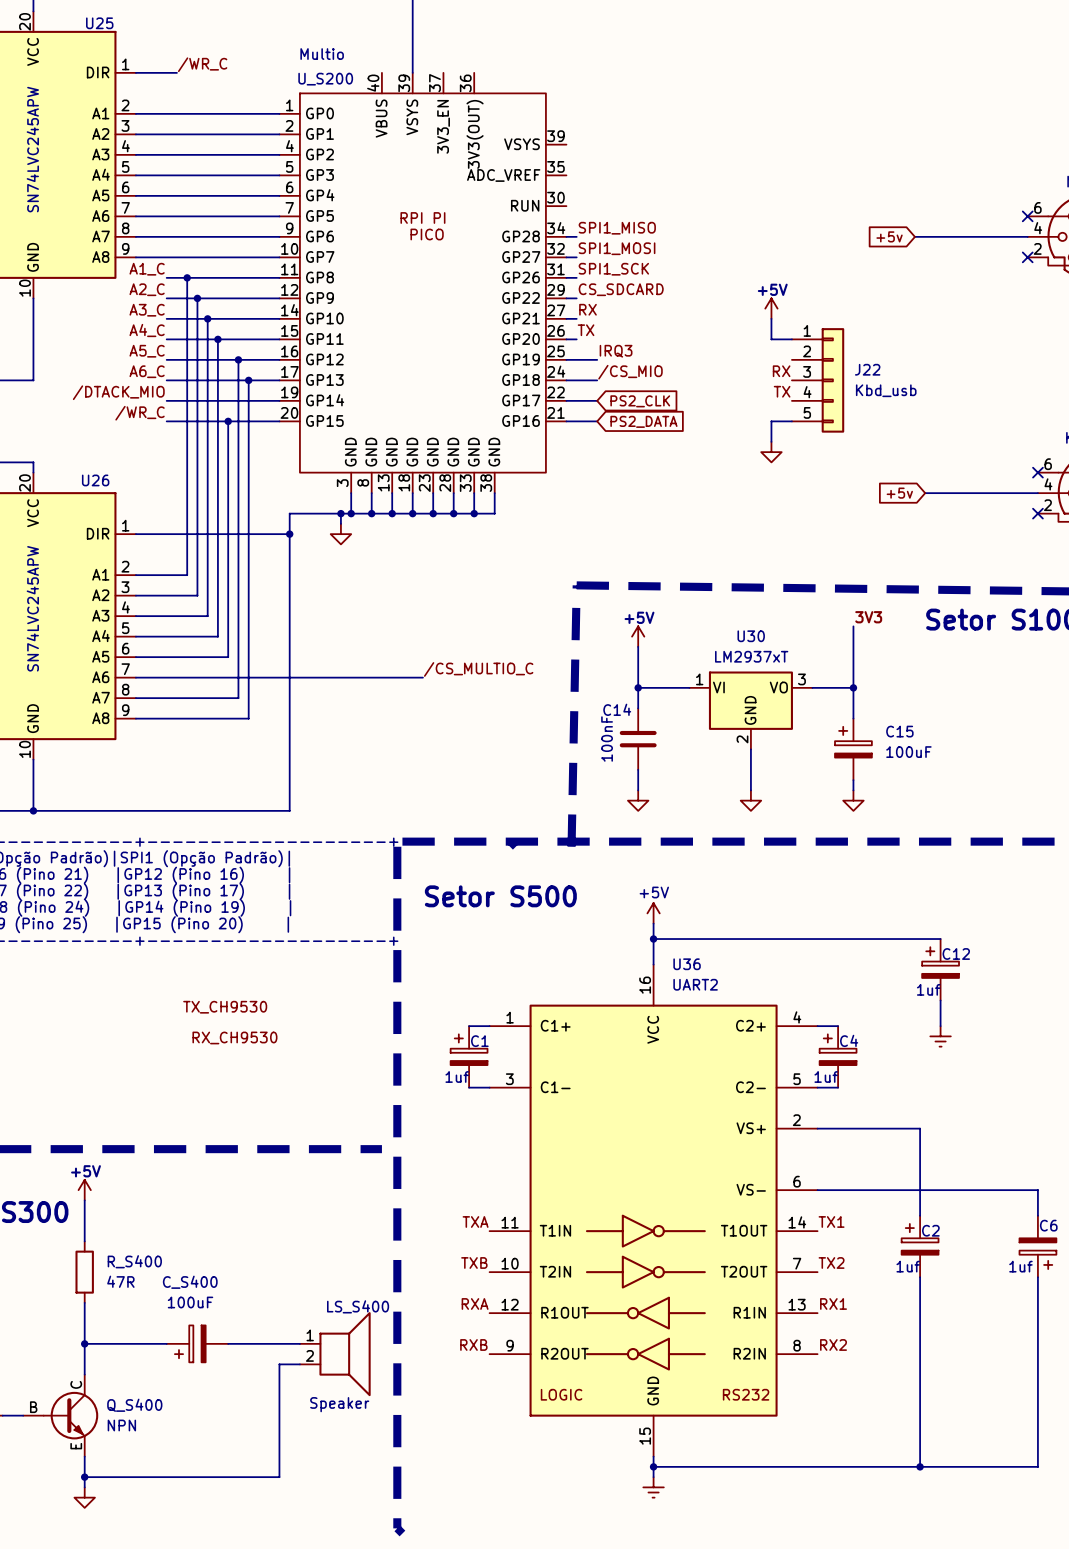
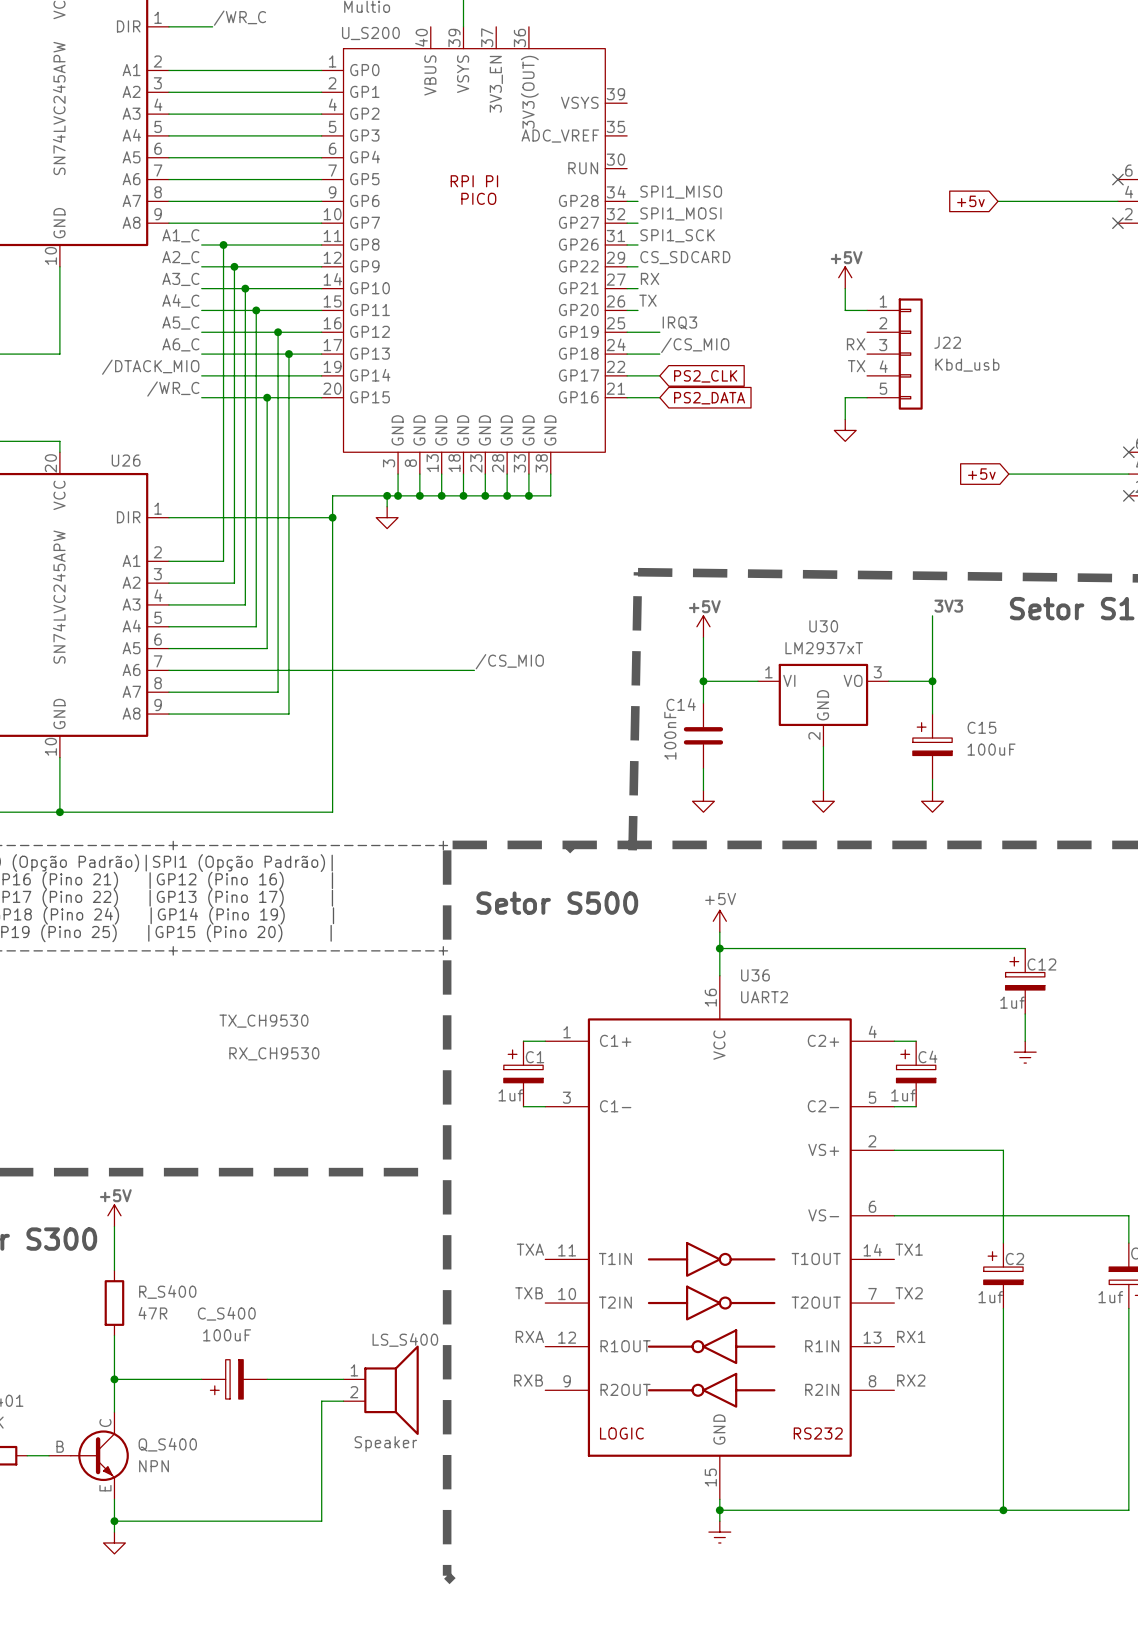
label: /CS_MULTIO_C (478, 669) -> /CS_MIO (509, 661)

